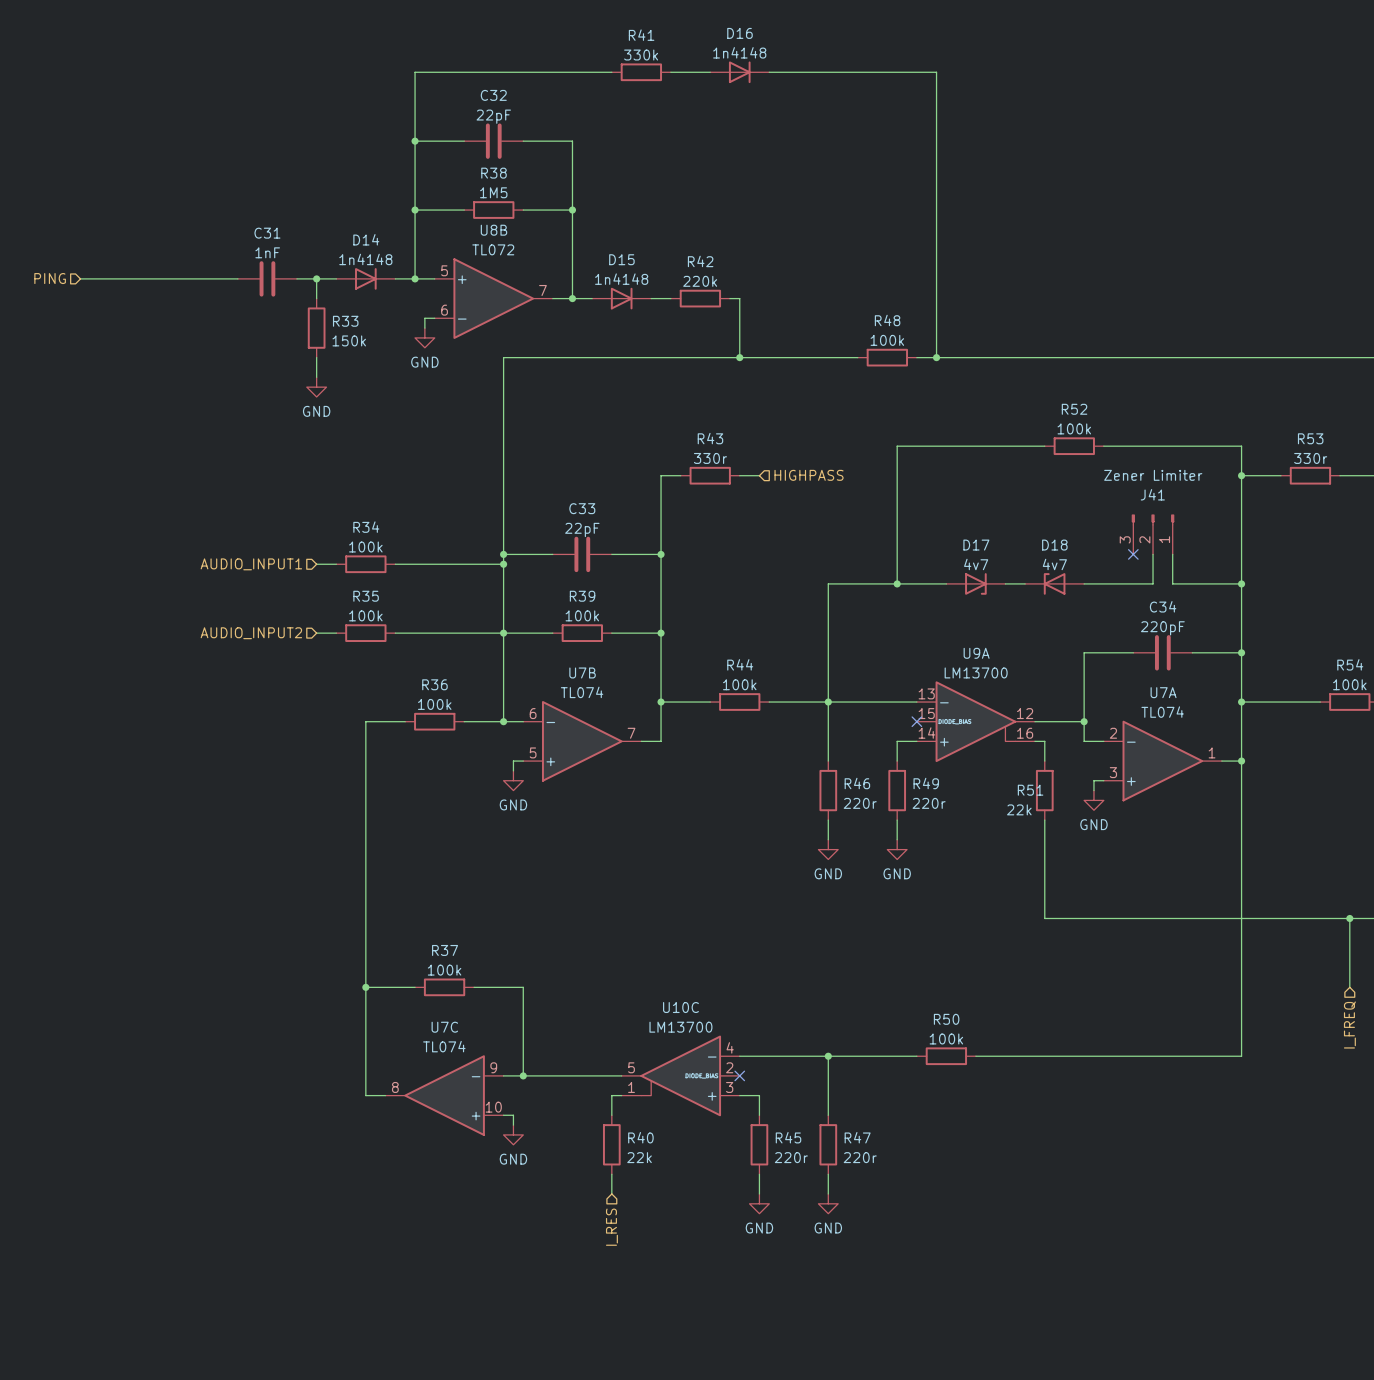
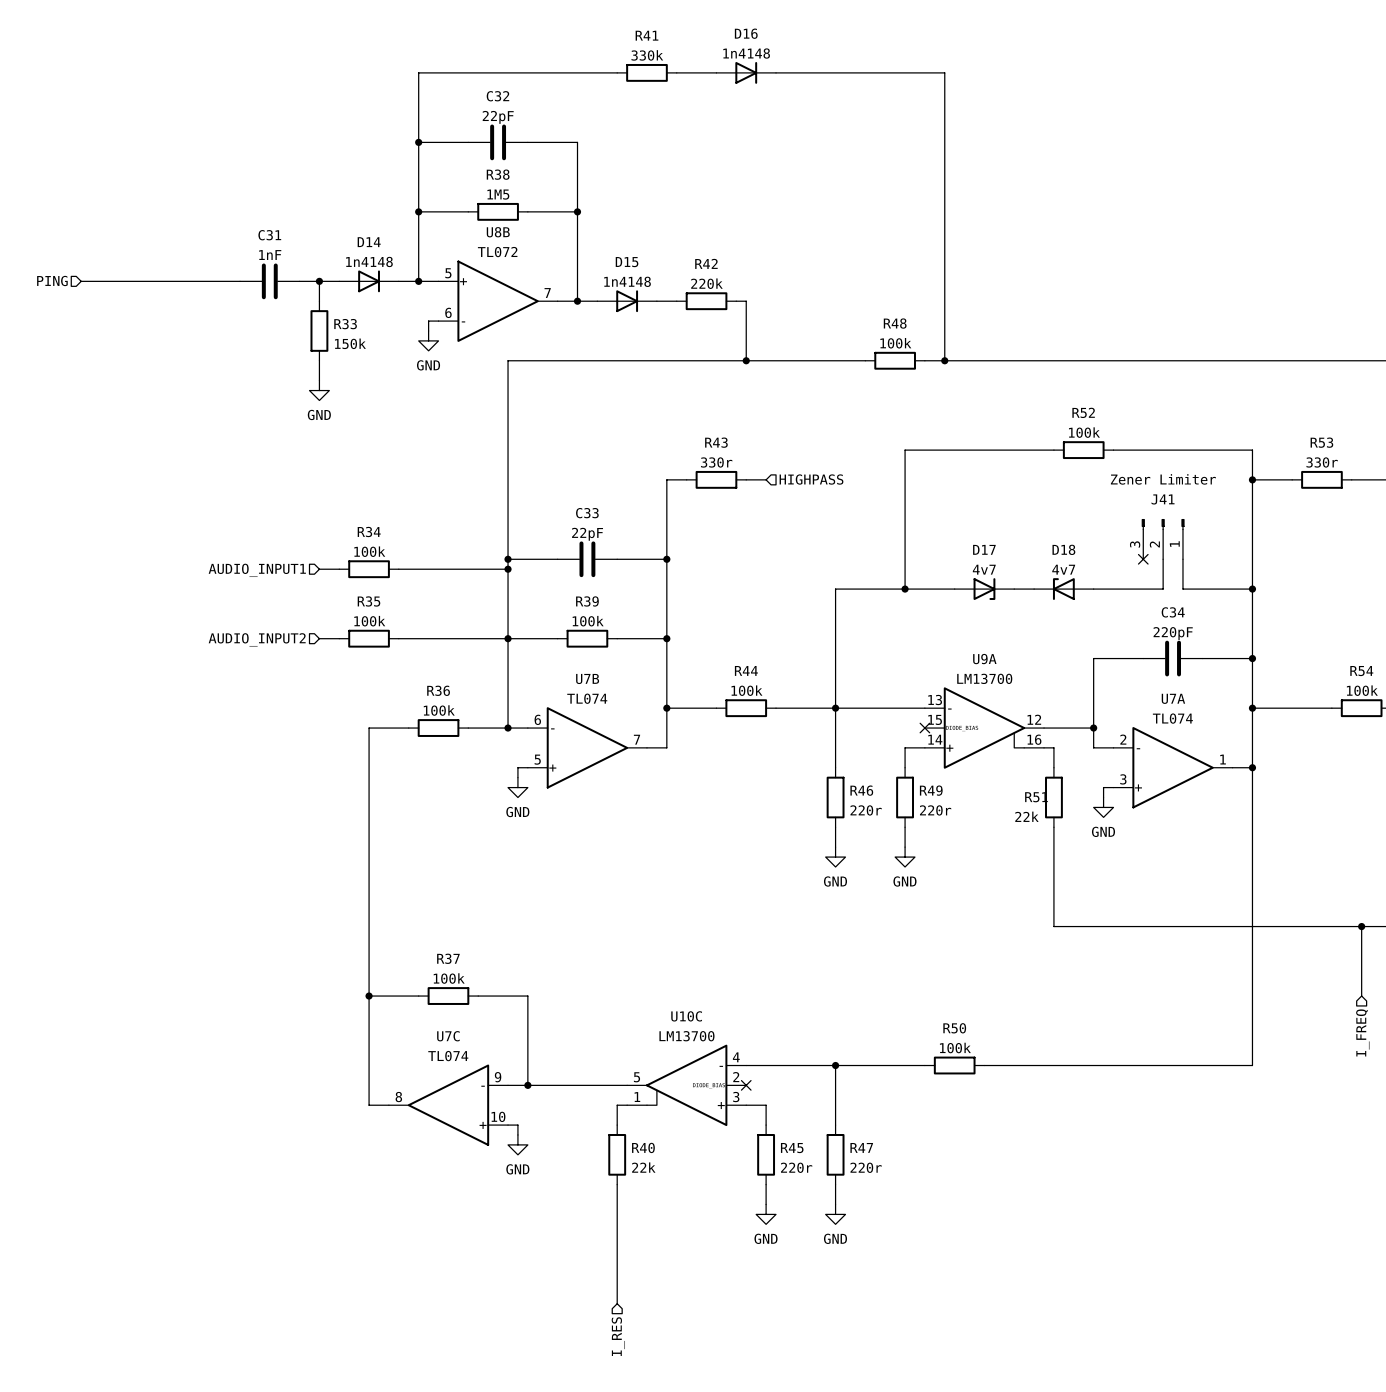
wire: none -> (617, 1204) (617, 1303)
hierarchical label position: I_RES (611, 1227) -> I_RES (618, 1336)

